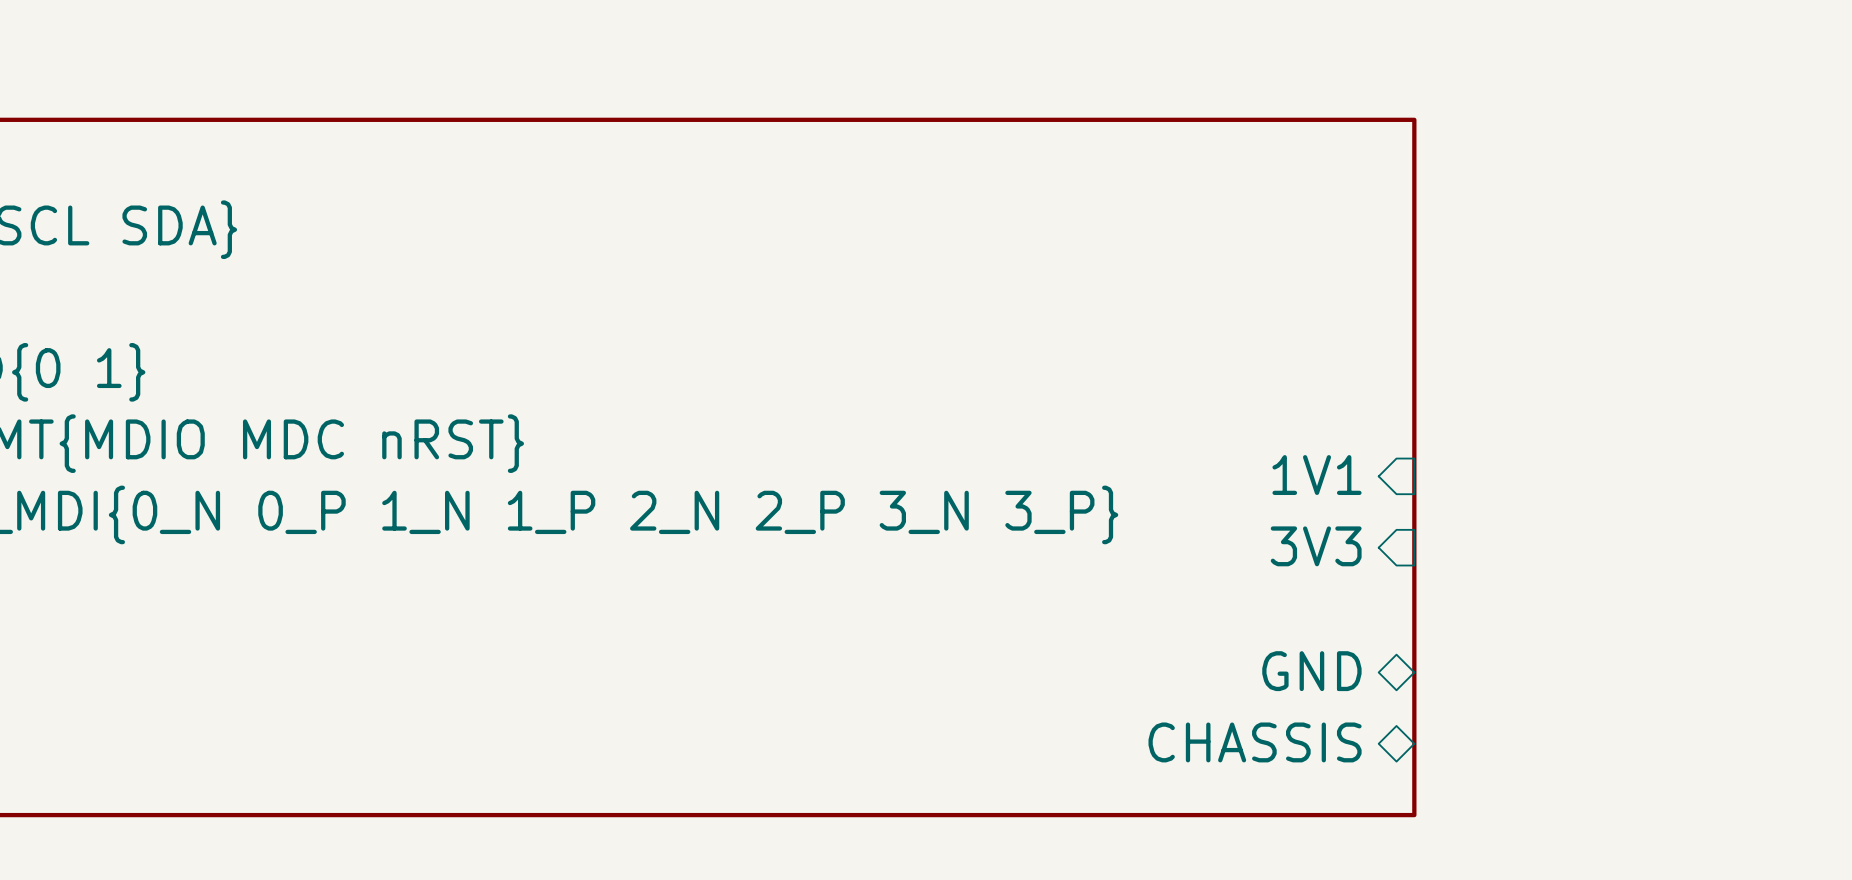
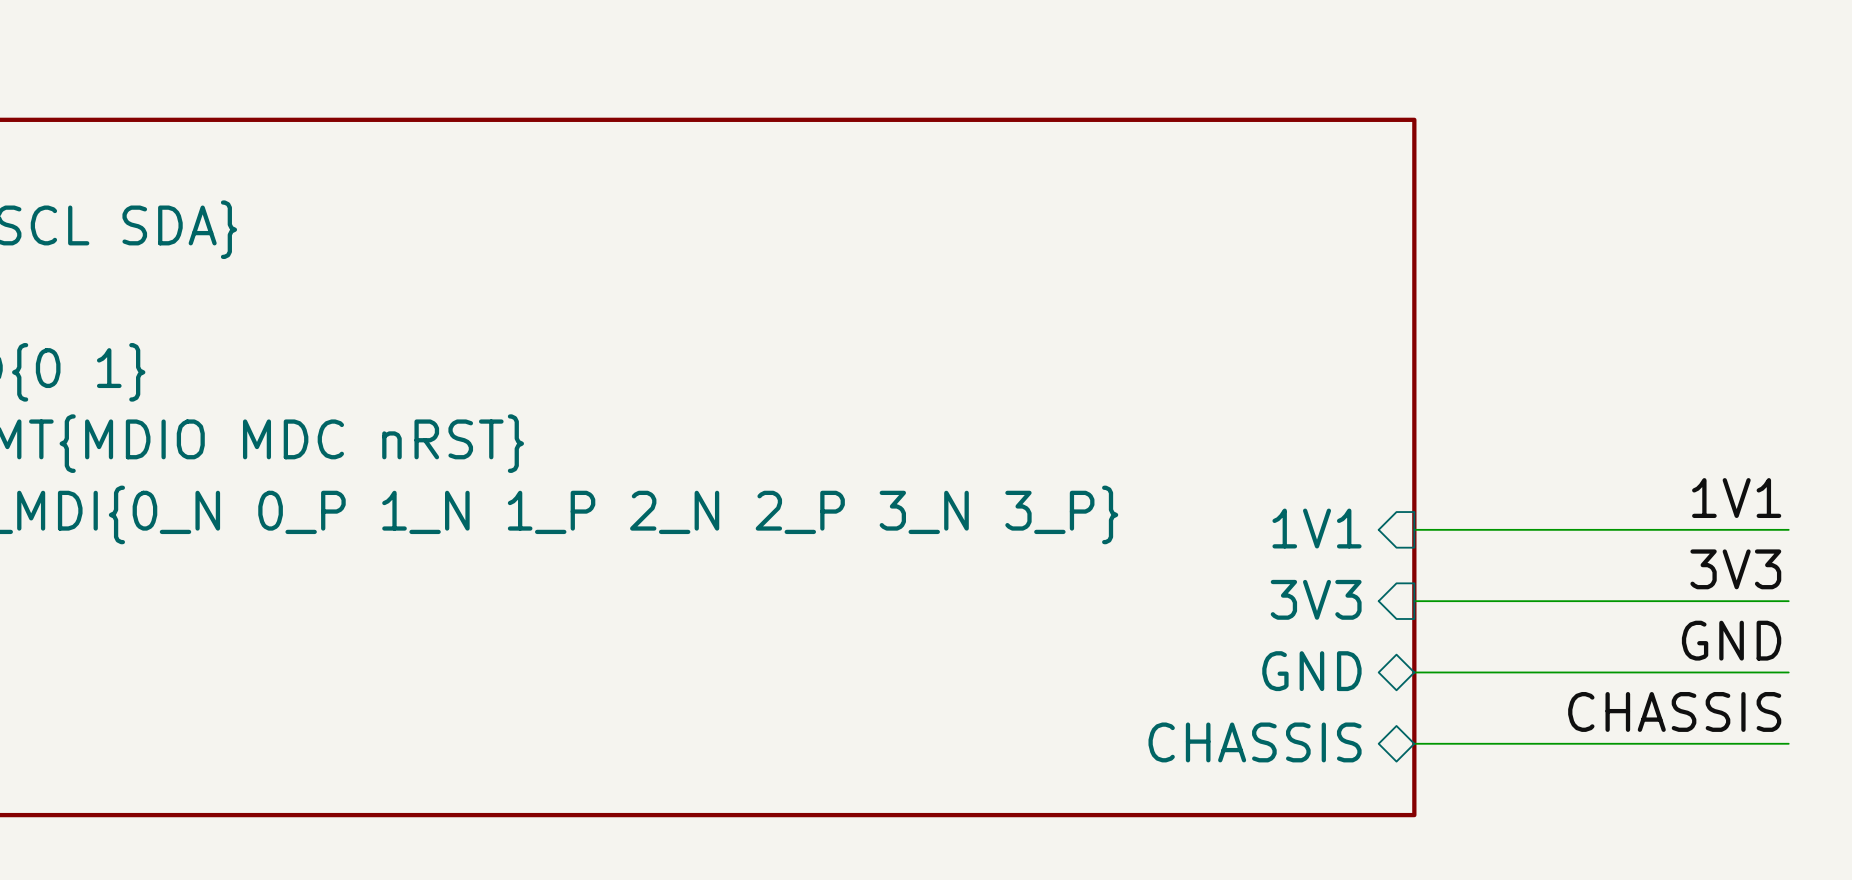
sheet pin position: 1V1 (1317, 475) -> 1V1 (1317, 528)
label: none -> 1V1 (1736, 498)
wire: none -> (1414, 529) (1788, 529)
sheet pin position: 3V3 (1316, 546) -> 3V3 (1316, 599)
label: none -> 3V3 (1735, 569)
wire: none -> (1414, 601) (1788, 601)
label: none -> GND (1731, 640)
wire: none -> (1414, 672) (1788, 672)
label: none -> CHASSIS (1674, 711)
wire: none -> (1414, 743) (1788, 743)

